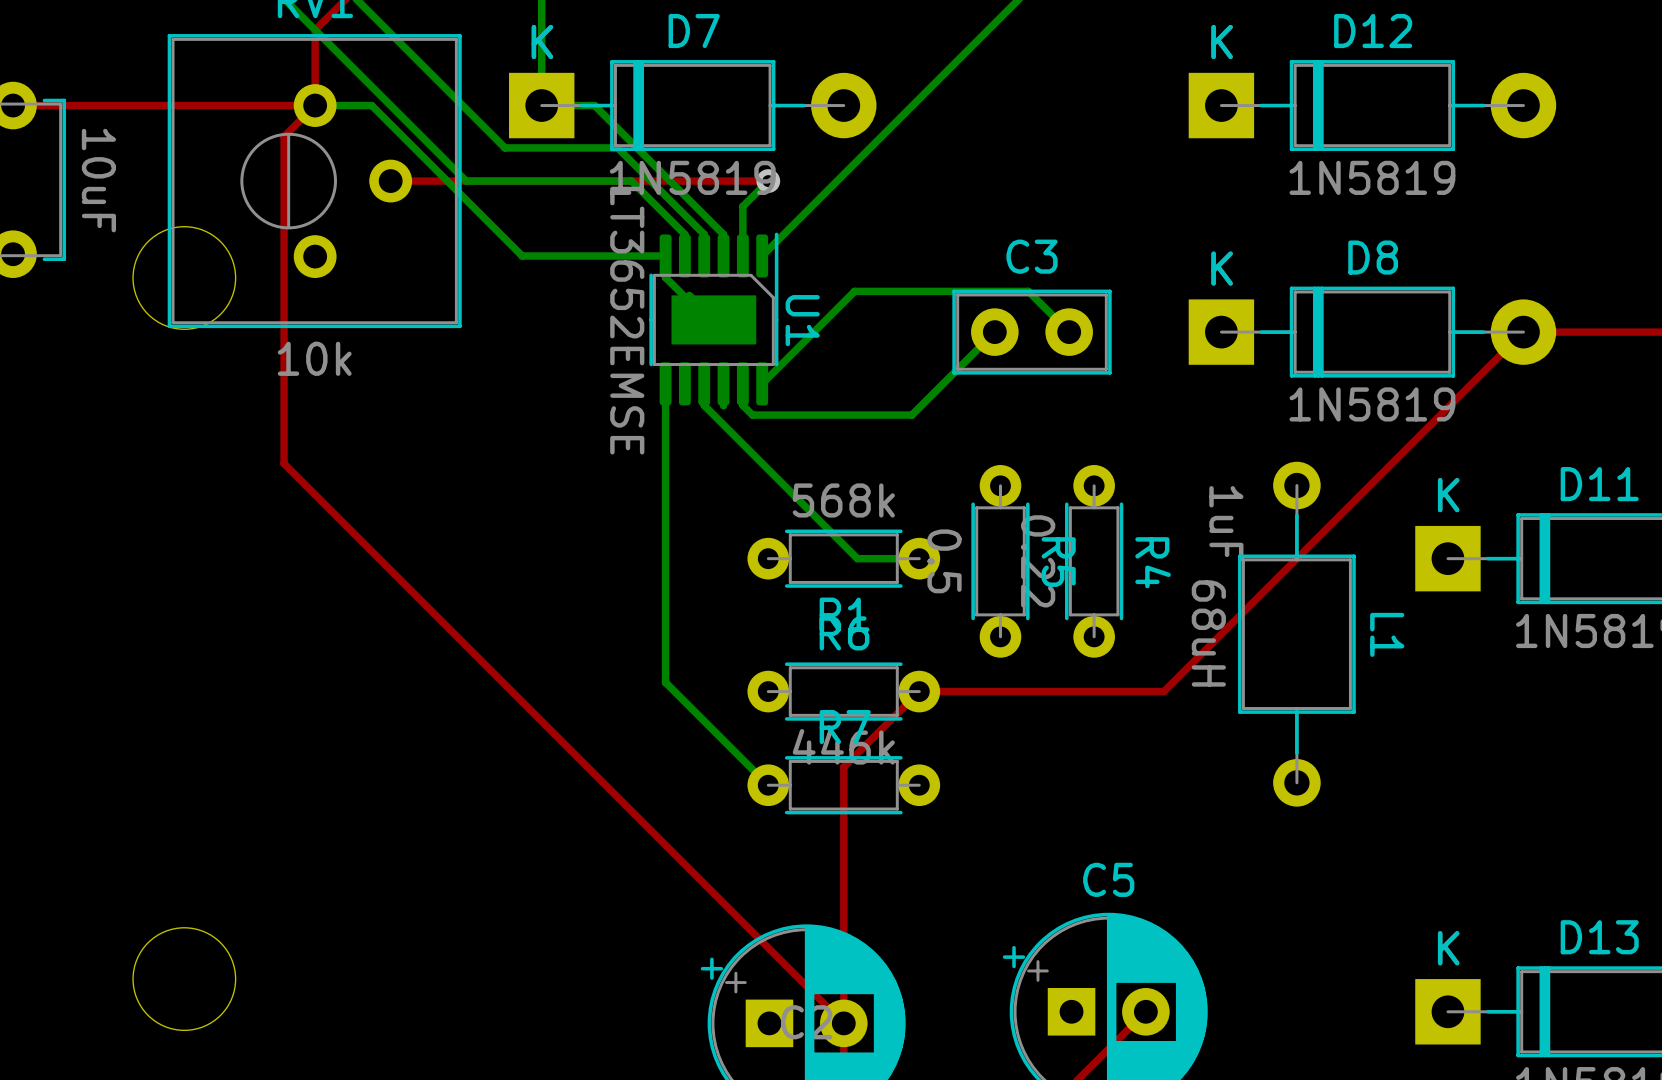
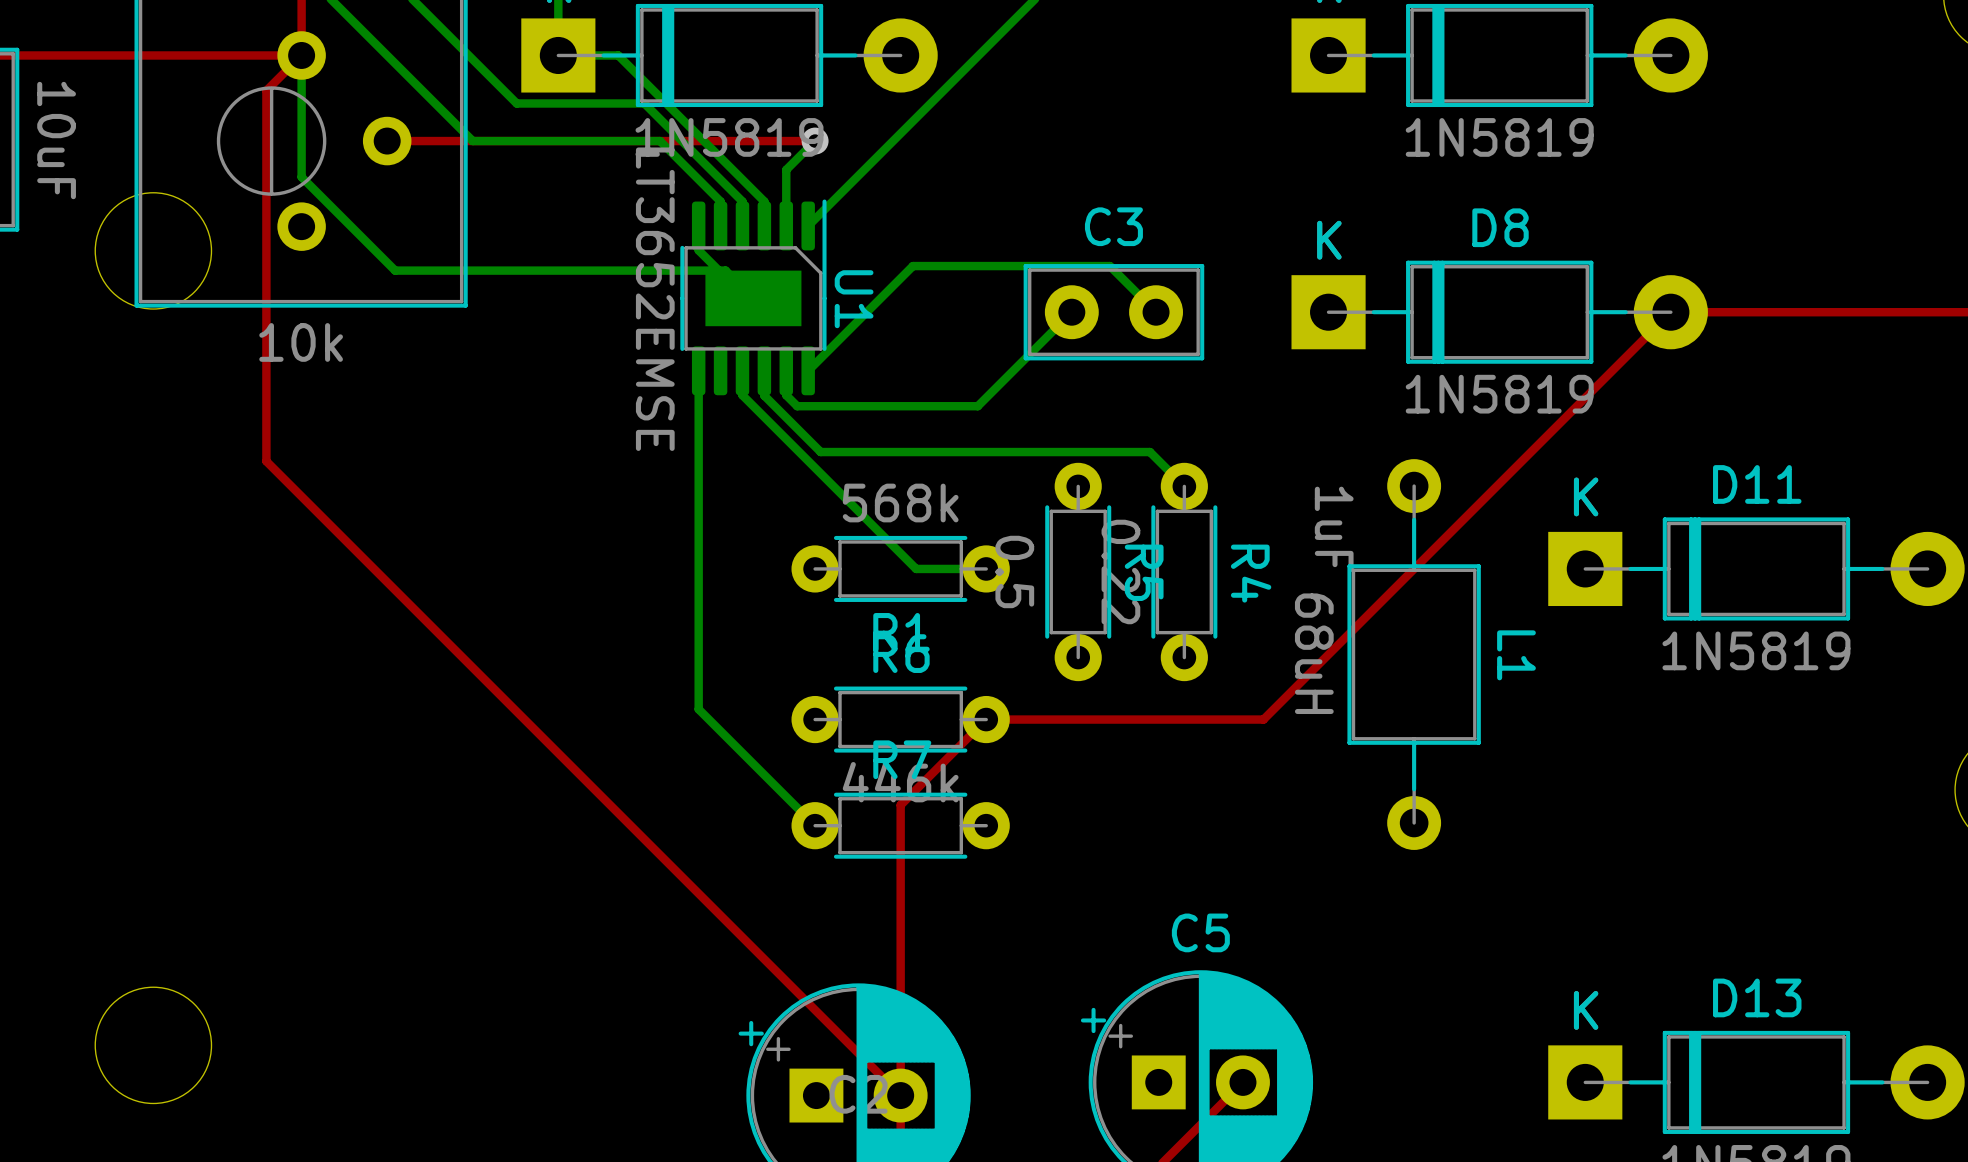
bottom track: (315, 105) (371, 105) (522, 255) (665, 255) -> (301, 55) (301, 177) (395, 270) (725, 270)
bottom track: none -> (764, 395) (820, 452) (1149, 452) (1184, 486)

